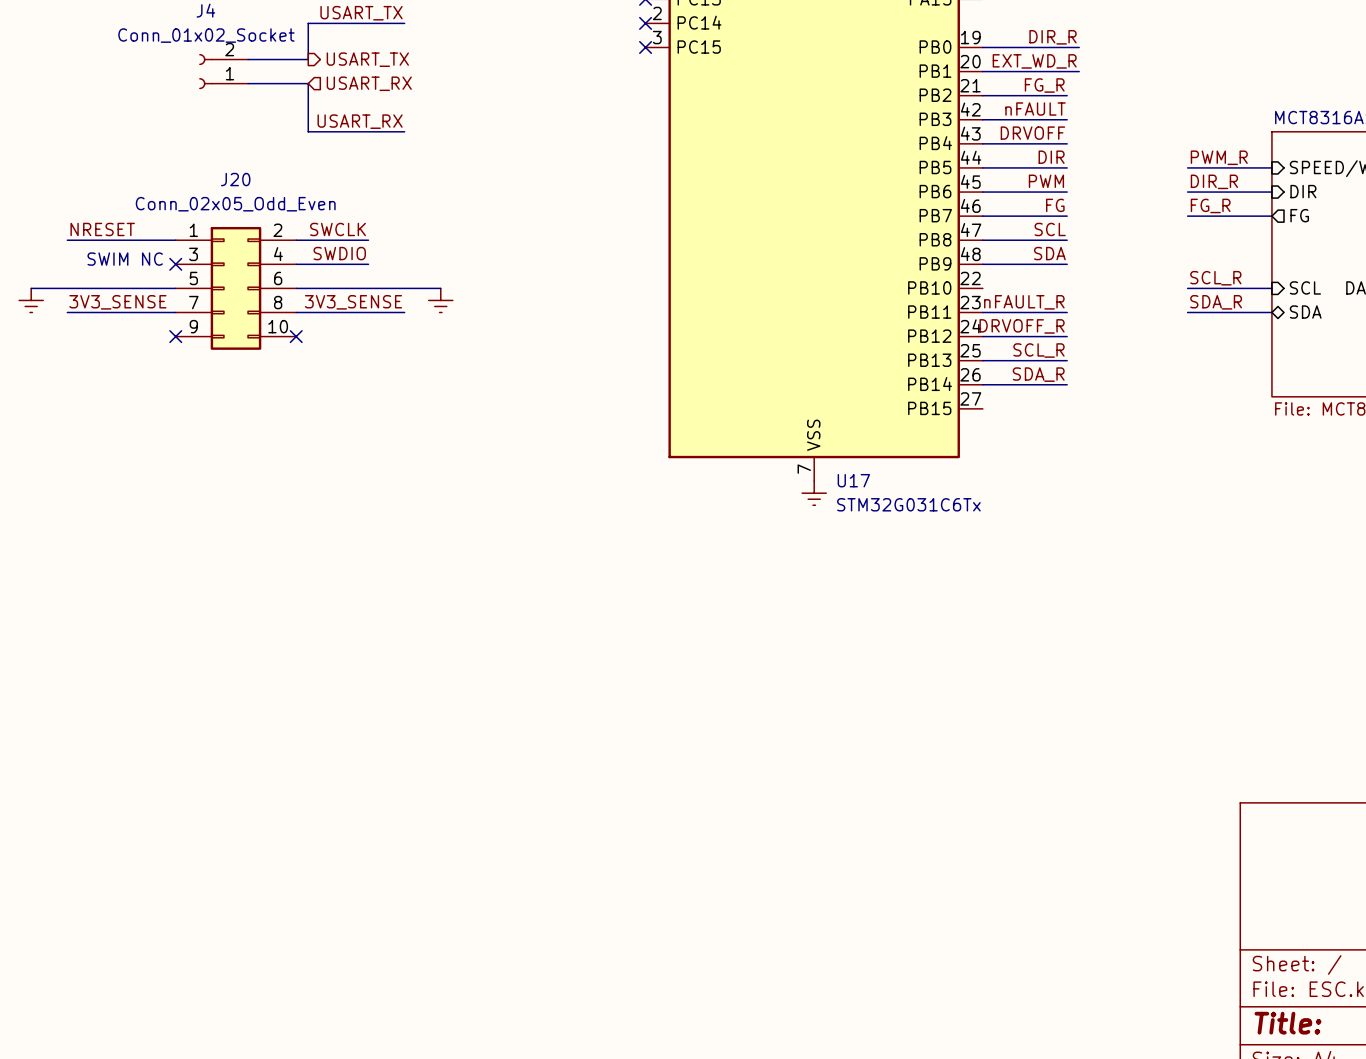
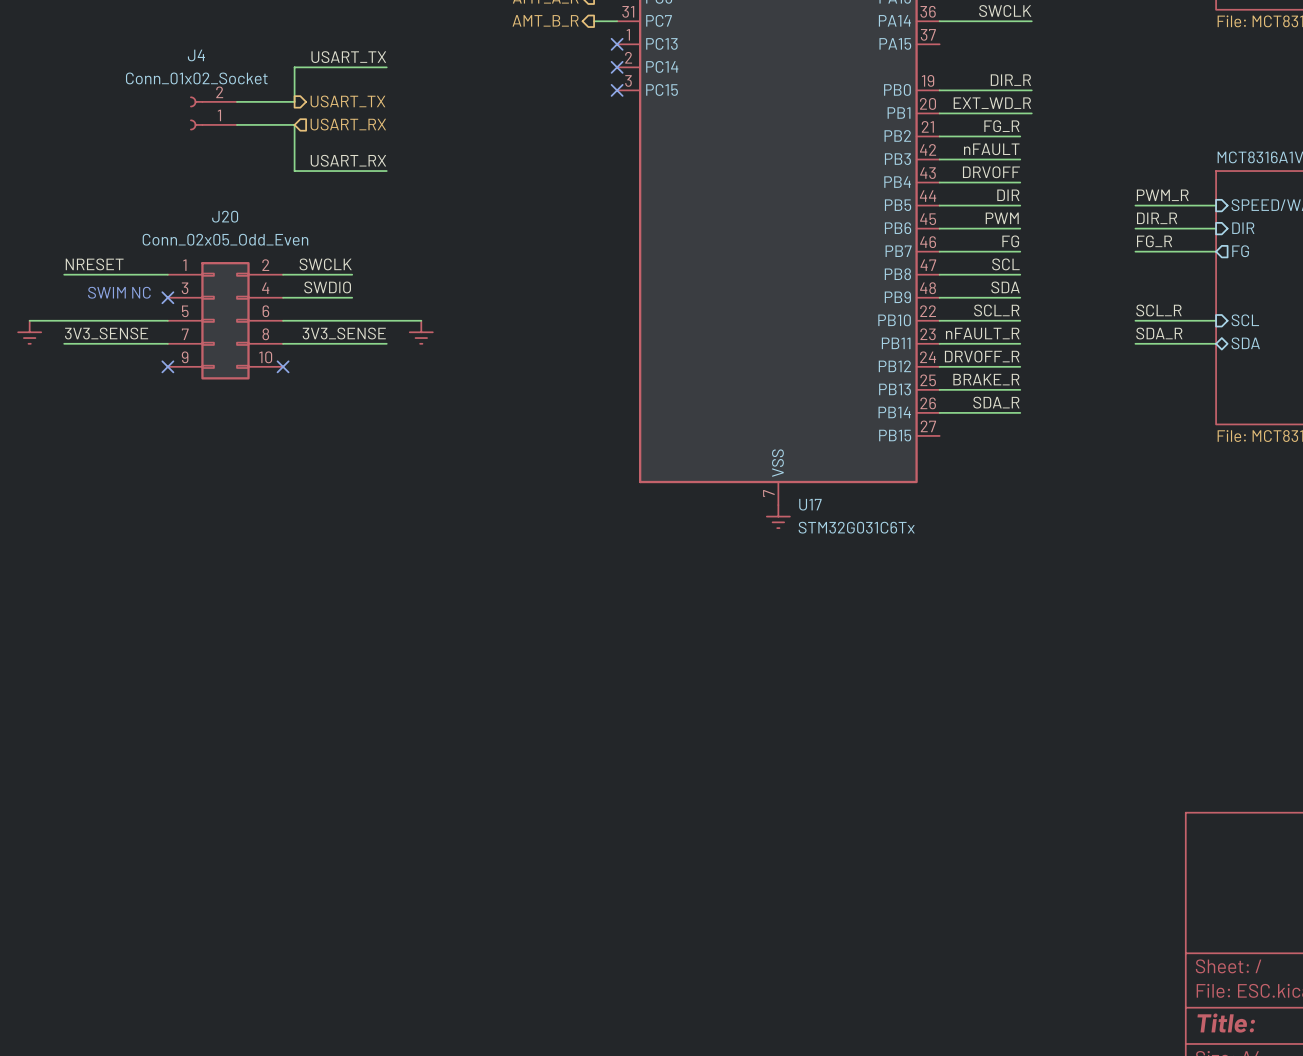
label: none -> SCL_R (996, 310)
wire: none -> (939, 320) (1020, 320)
label: SCL_R (1038, 350) -> BRAKE_R (986, 379)

